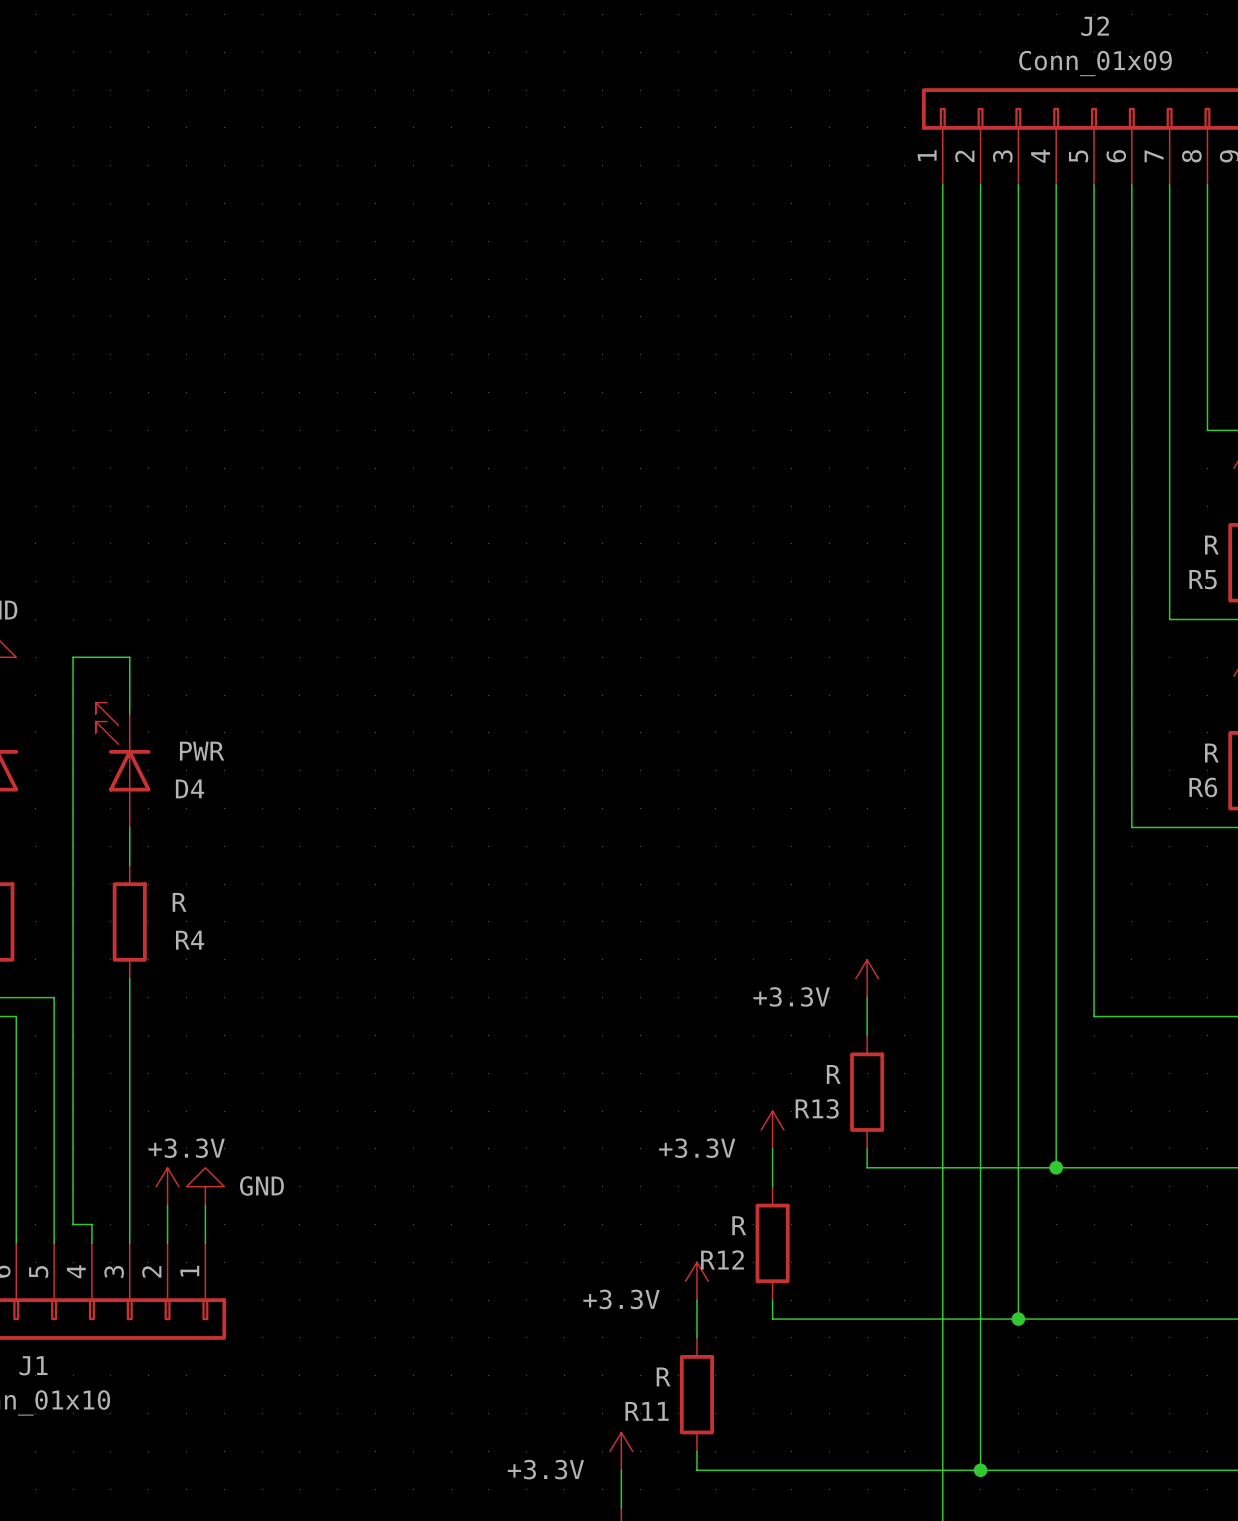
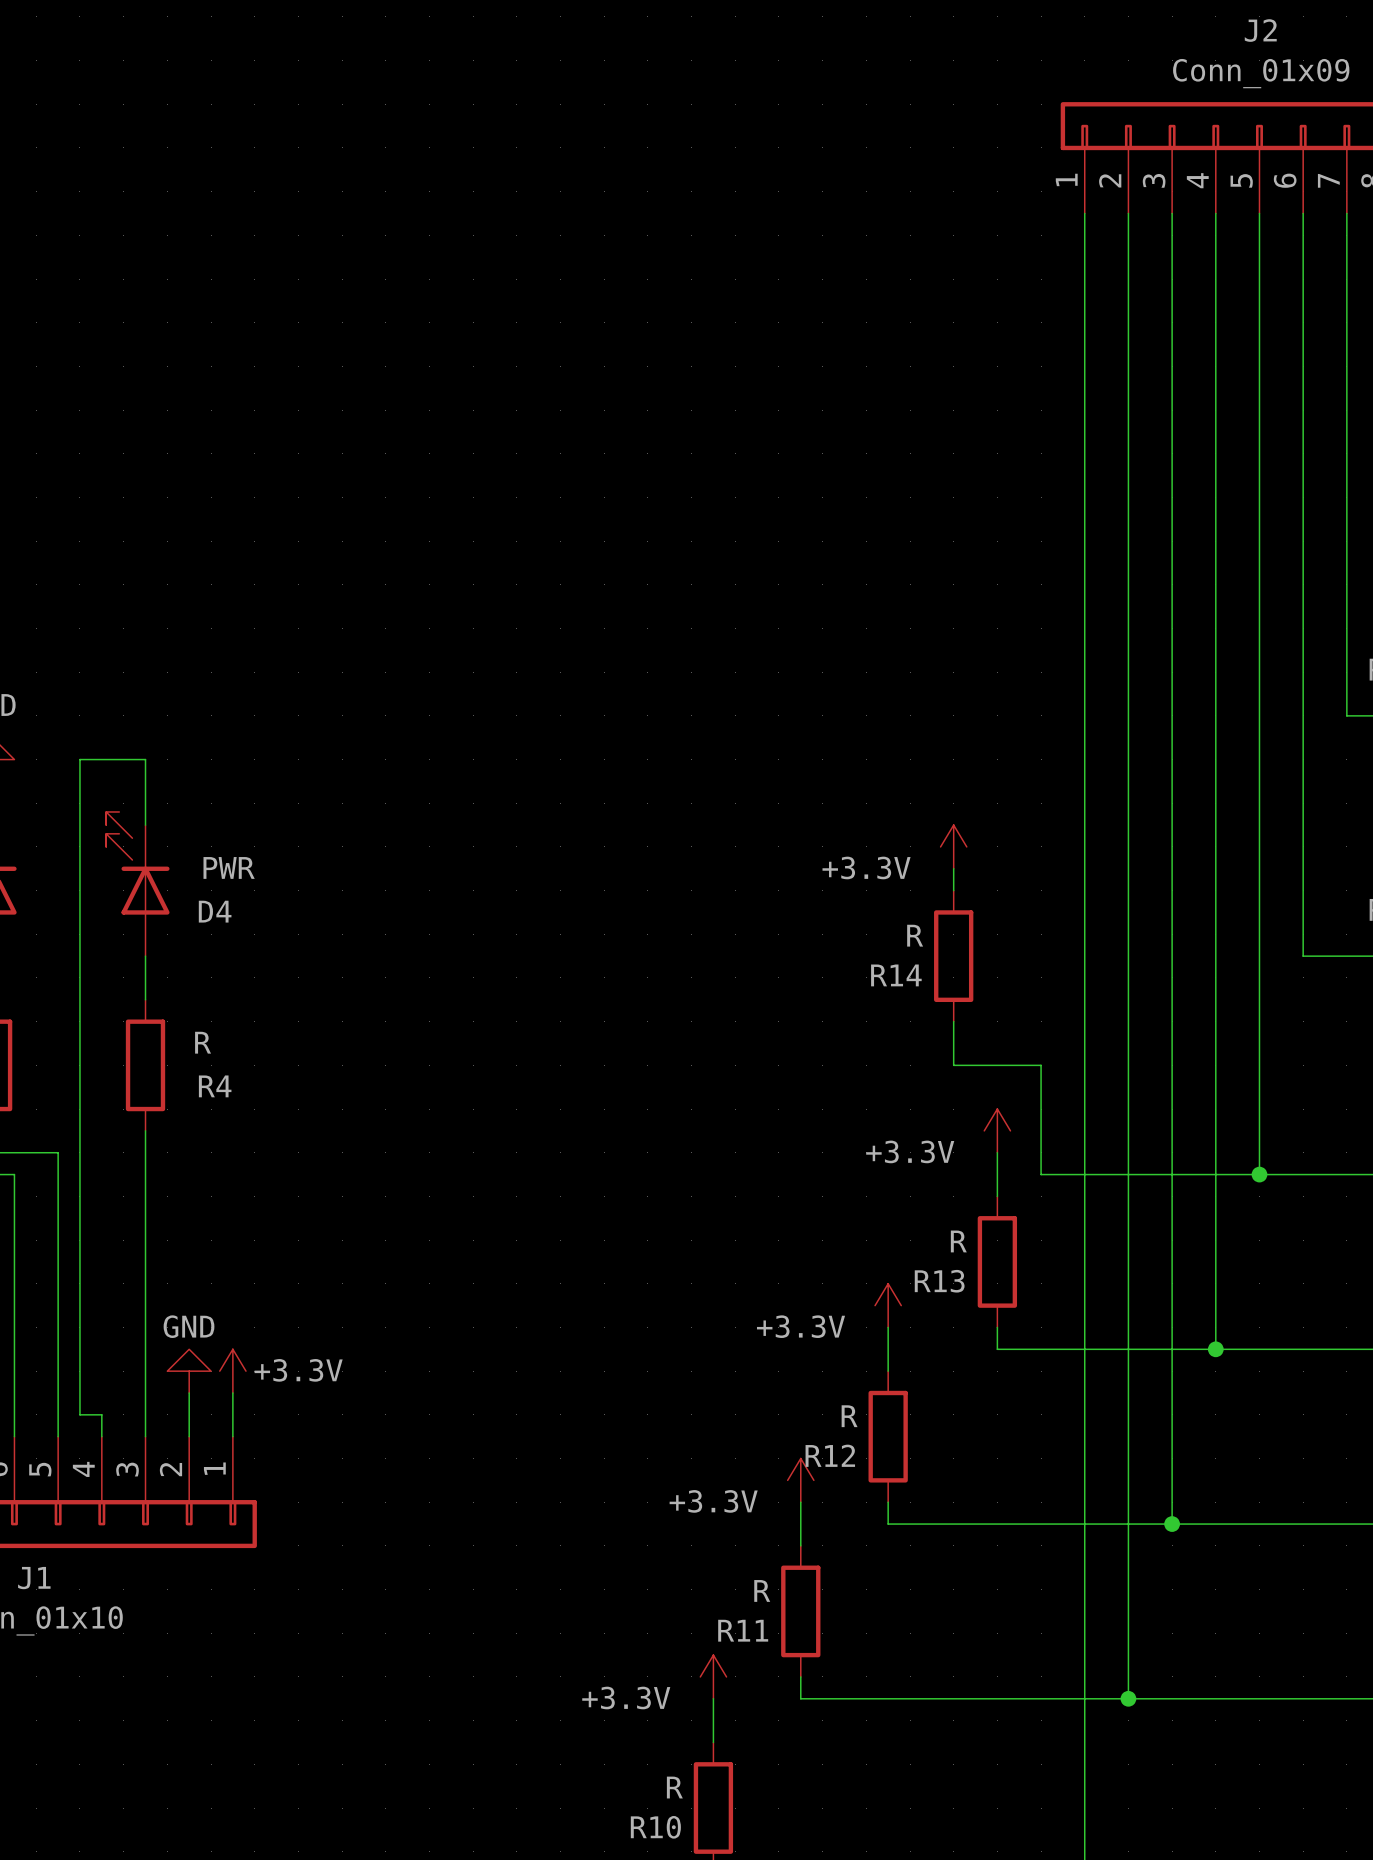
power symbol: none -> +3.3V (953, 846)
wire: none -> (953, 868) (953, 890)
R14: none -> R (953, 956)
wire: none -> (953, 1021) (953, 1065) (1041, 1065) (1041, 1174) (1259, 1174)
junction: none -> (1259, 1174)
power symbol: +3.3V (167, 1186) -> GND (189, 1371)
power symbol: GND (205, 1186) -> +3.3V (232, 1371)

